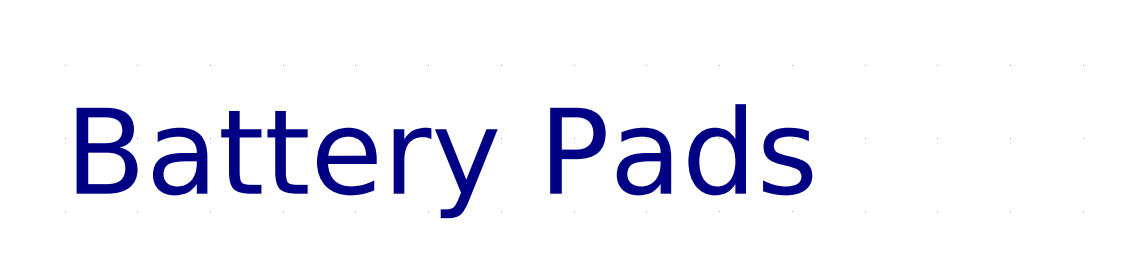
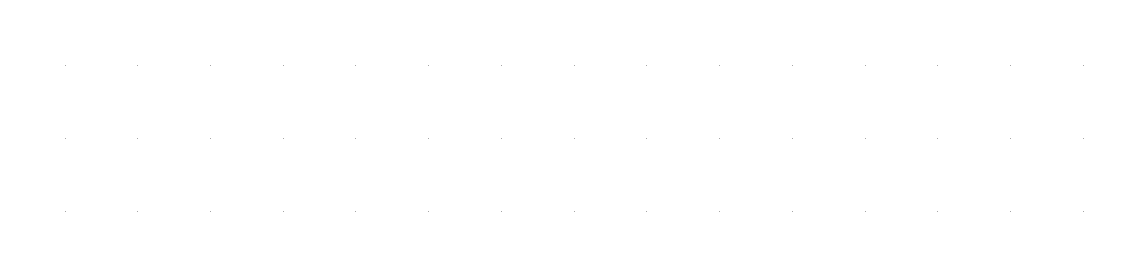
text: Battery Pads (444, 161) -> none

